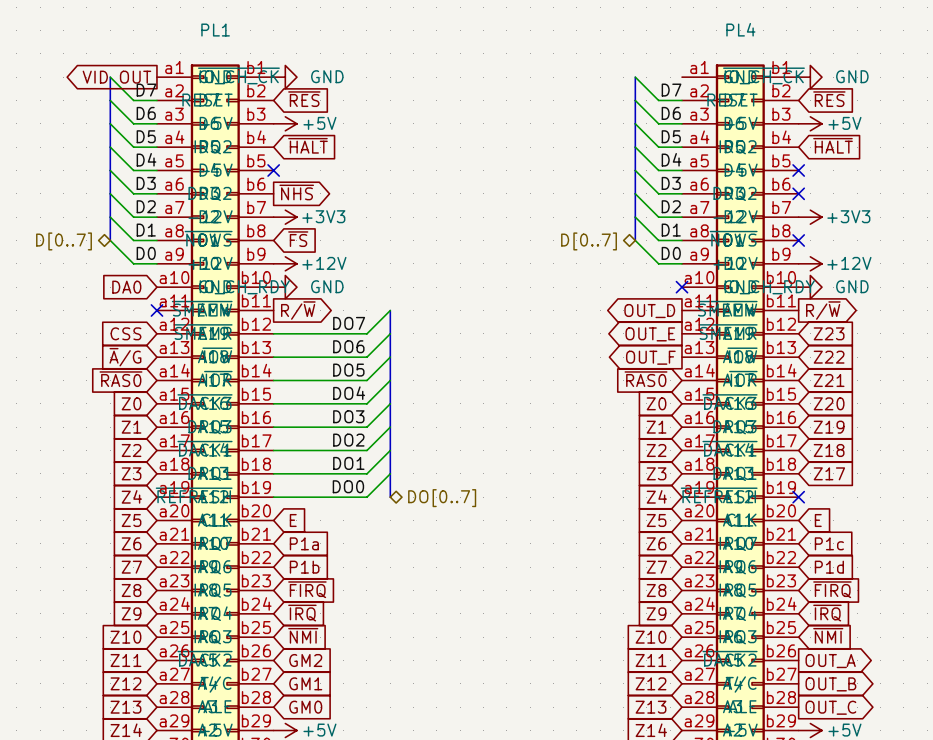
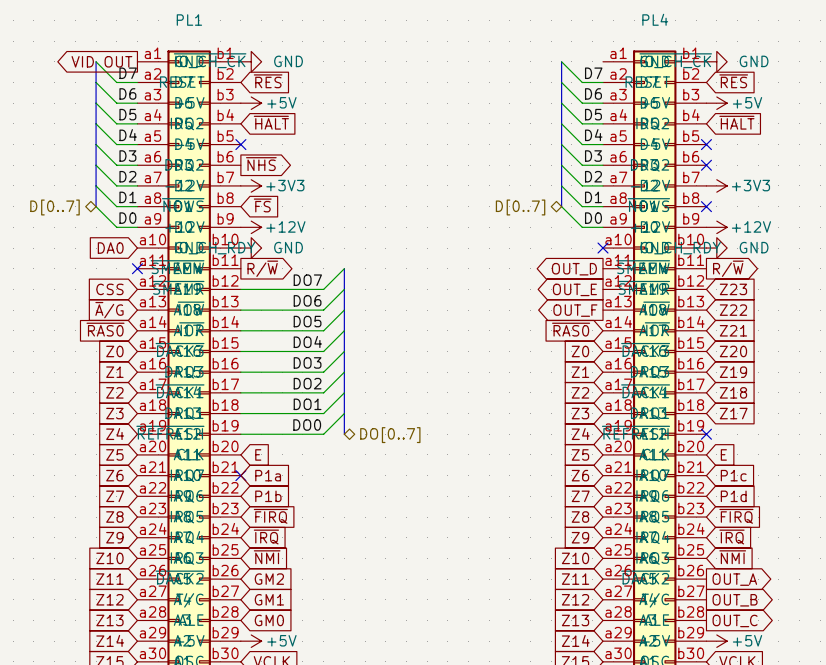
no-connect mark: none -> (240, 475)

